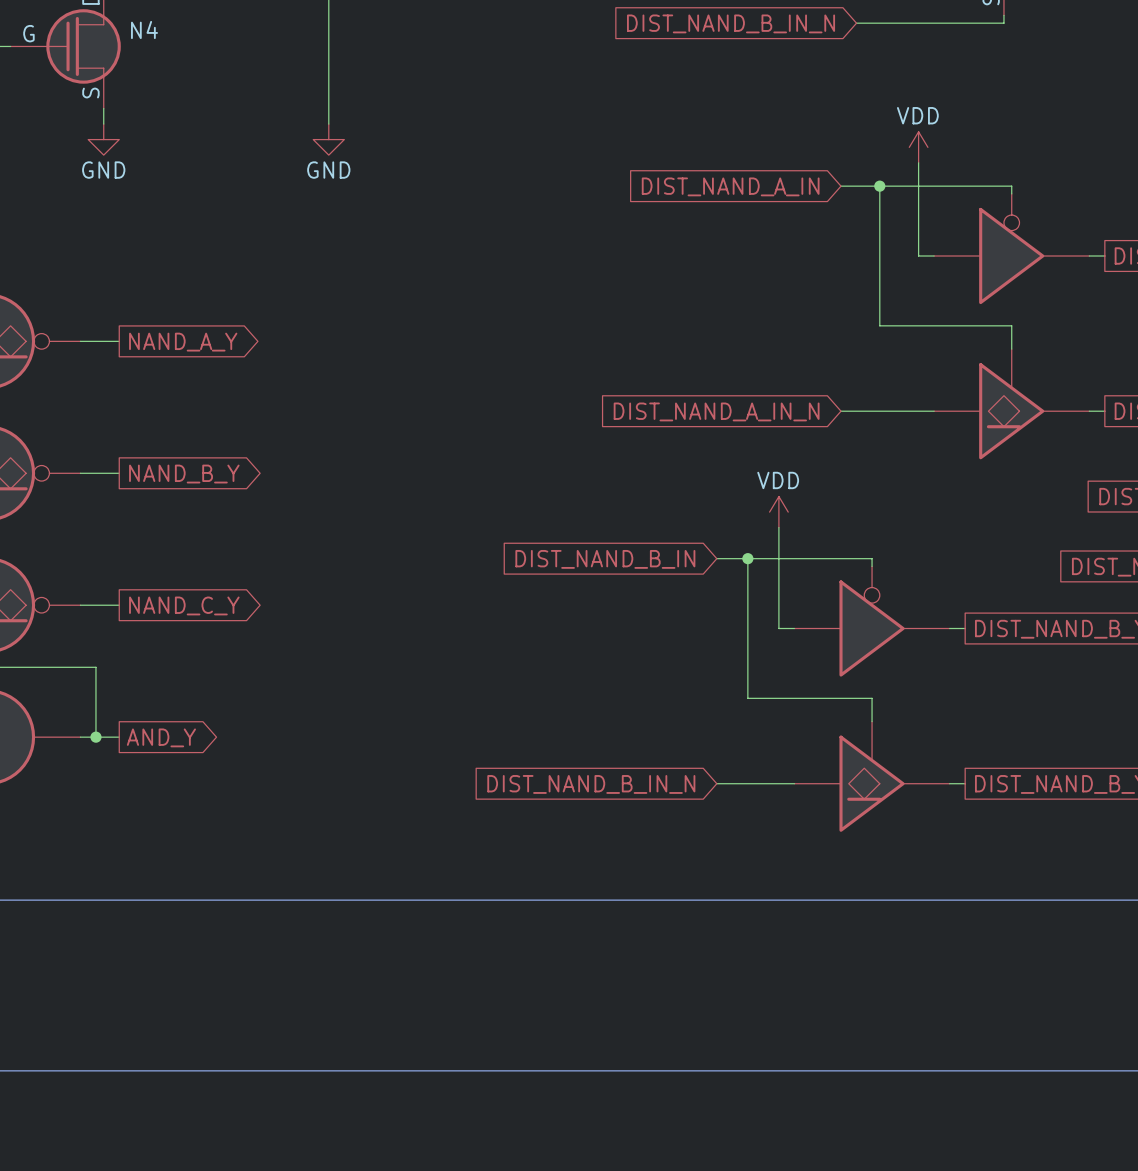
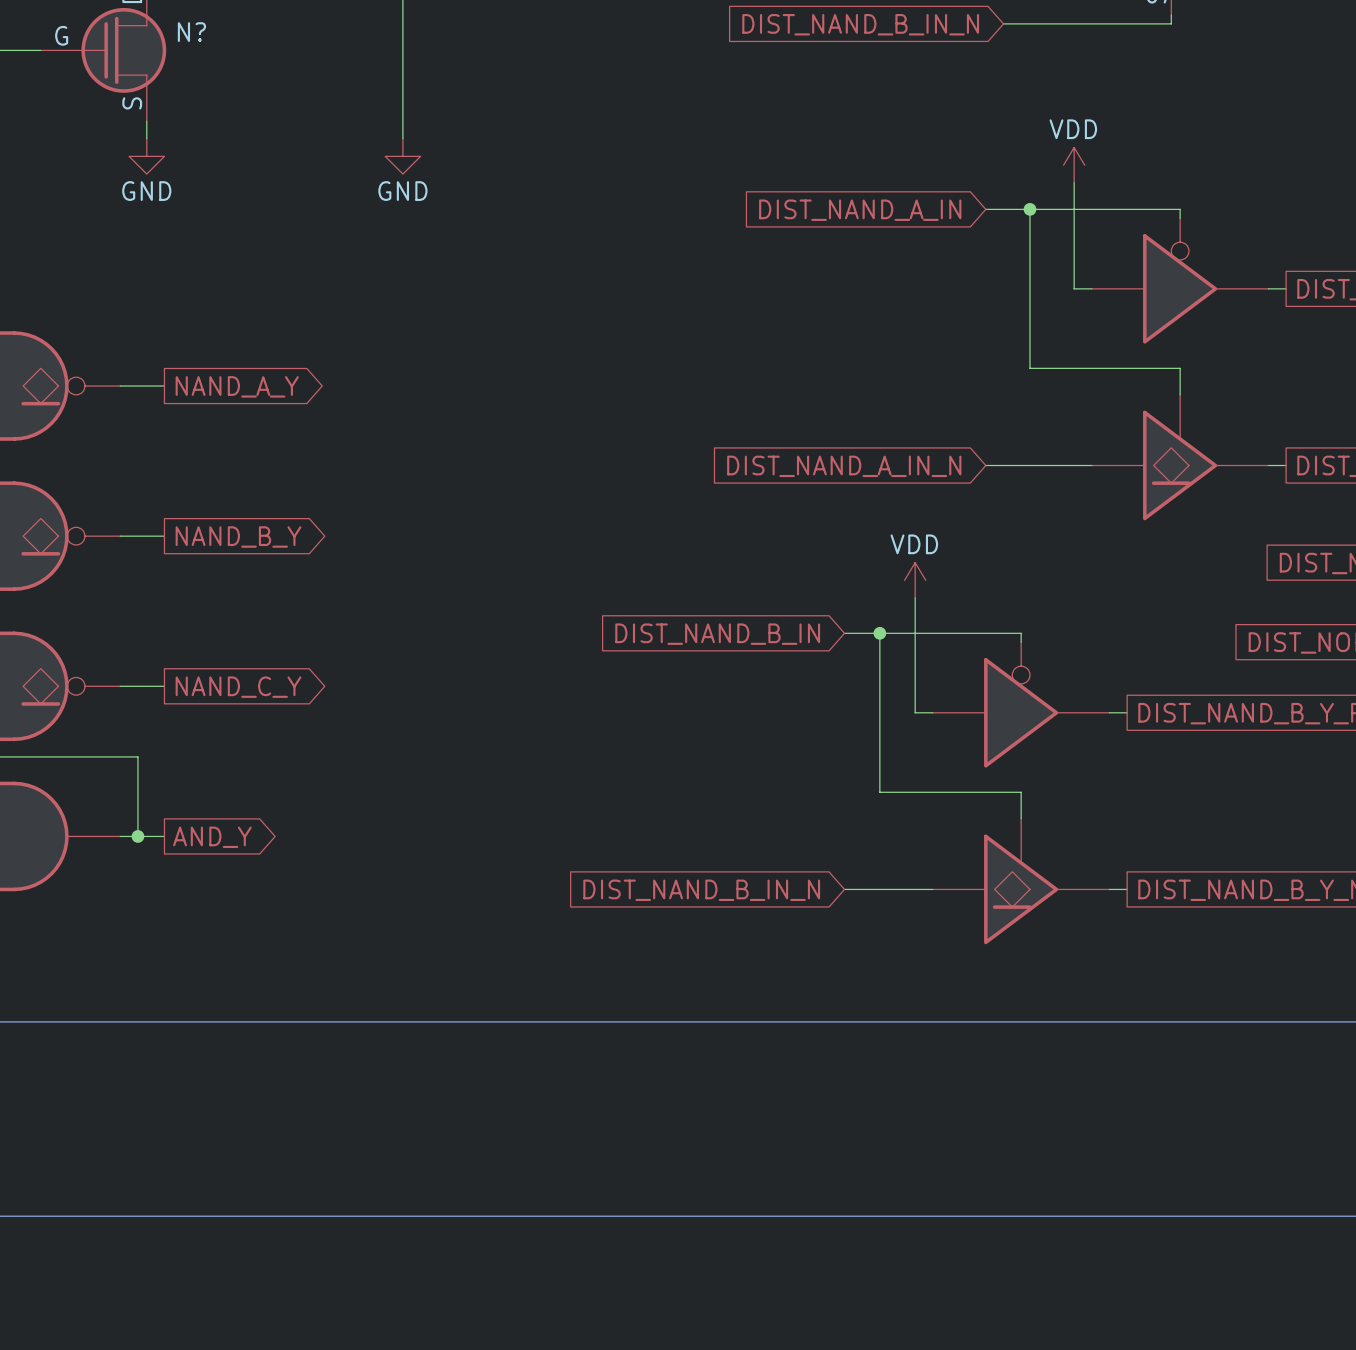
N4 name: N4 (144, 29) -> N? (191, 32)

